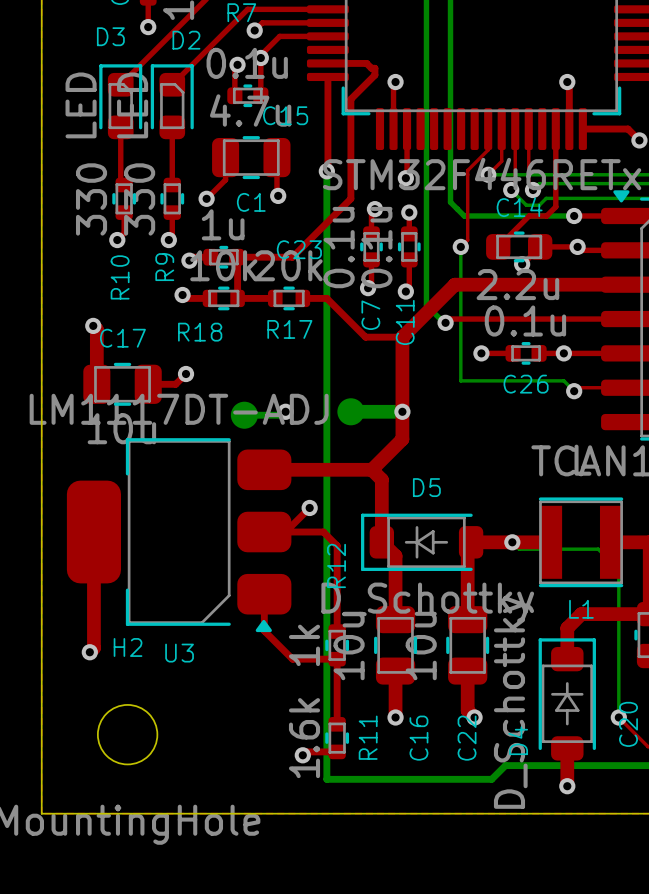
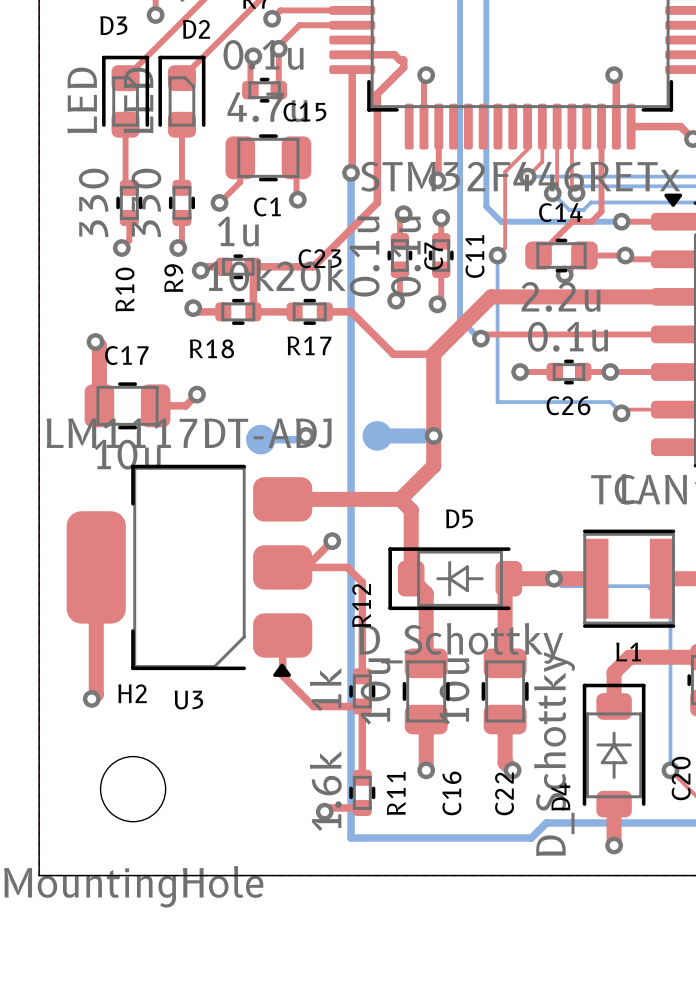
C7 name position: C7 (370, 315) -> C7 (433, 256)
C11 name position: C11 (405, 322) -> C11 (474, 256)

